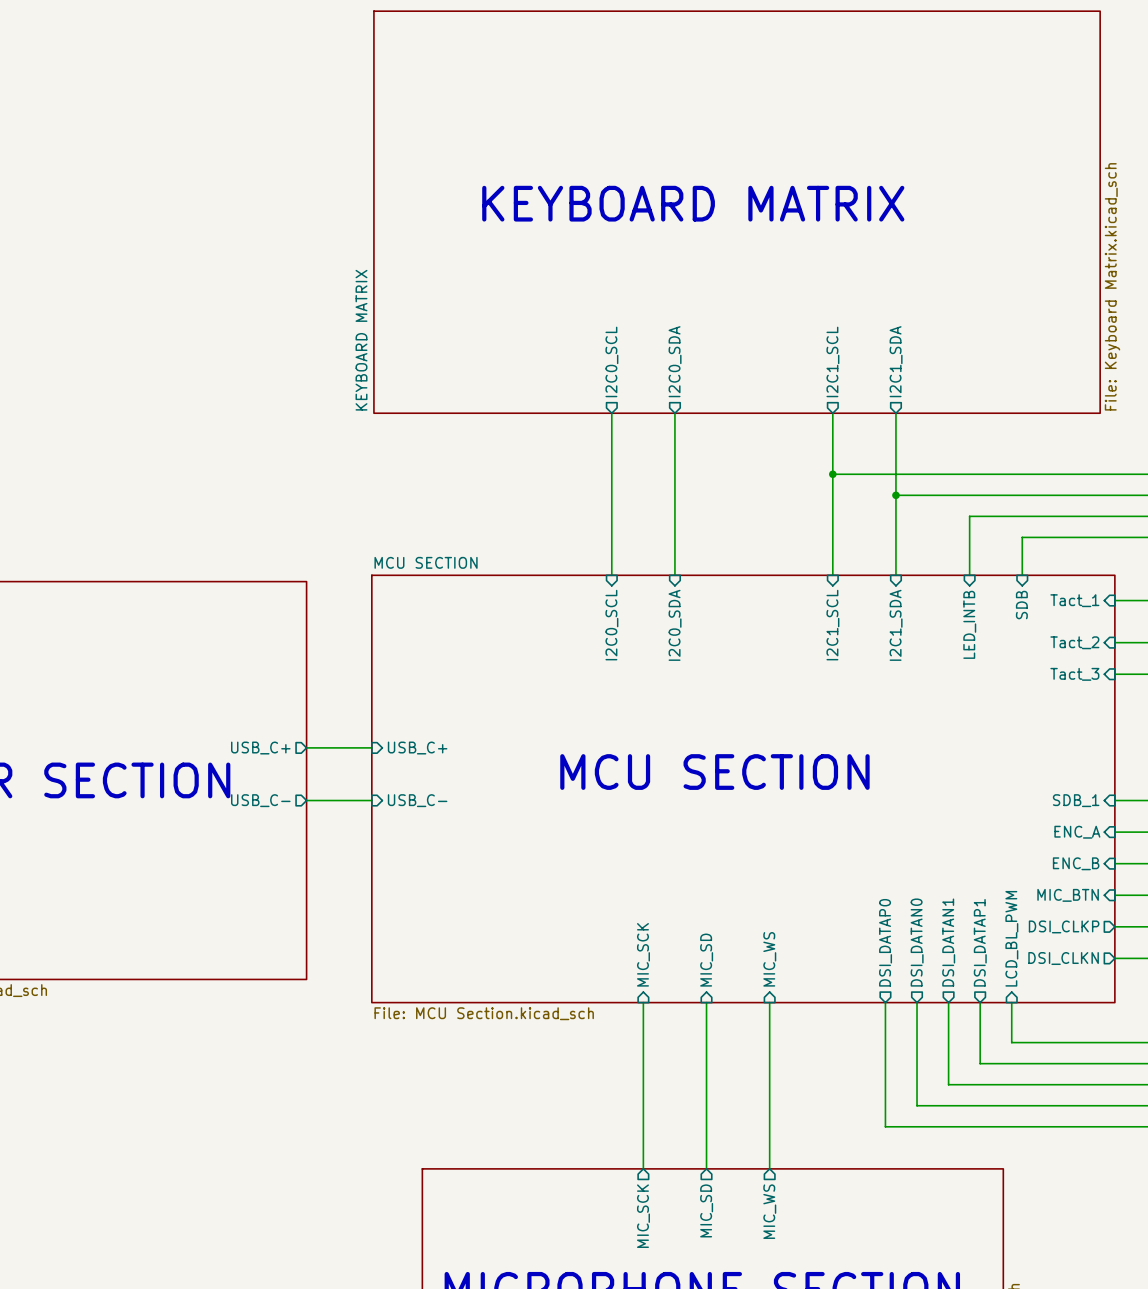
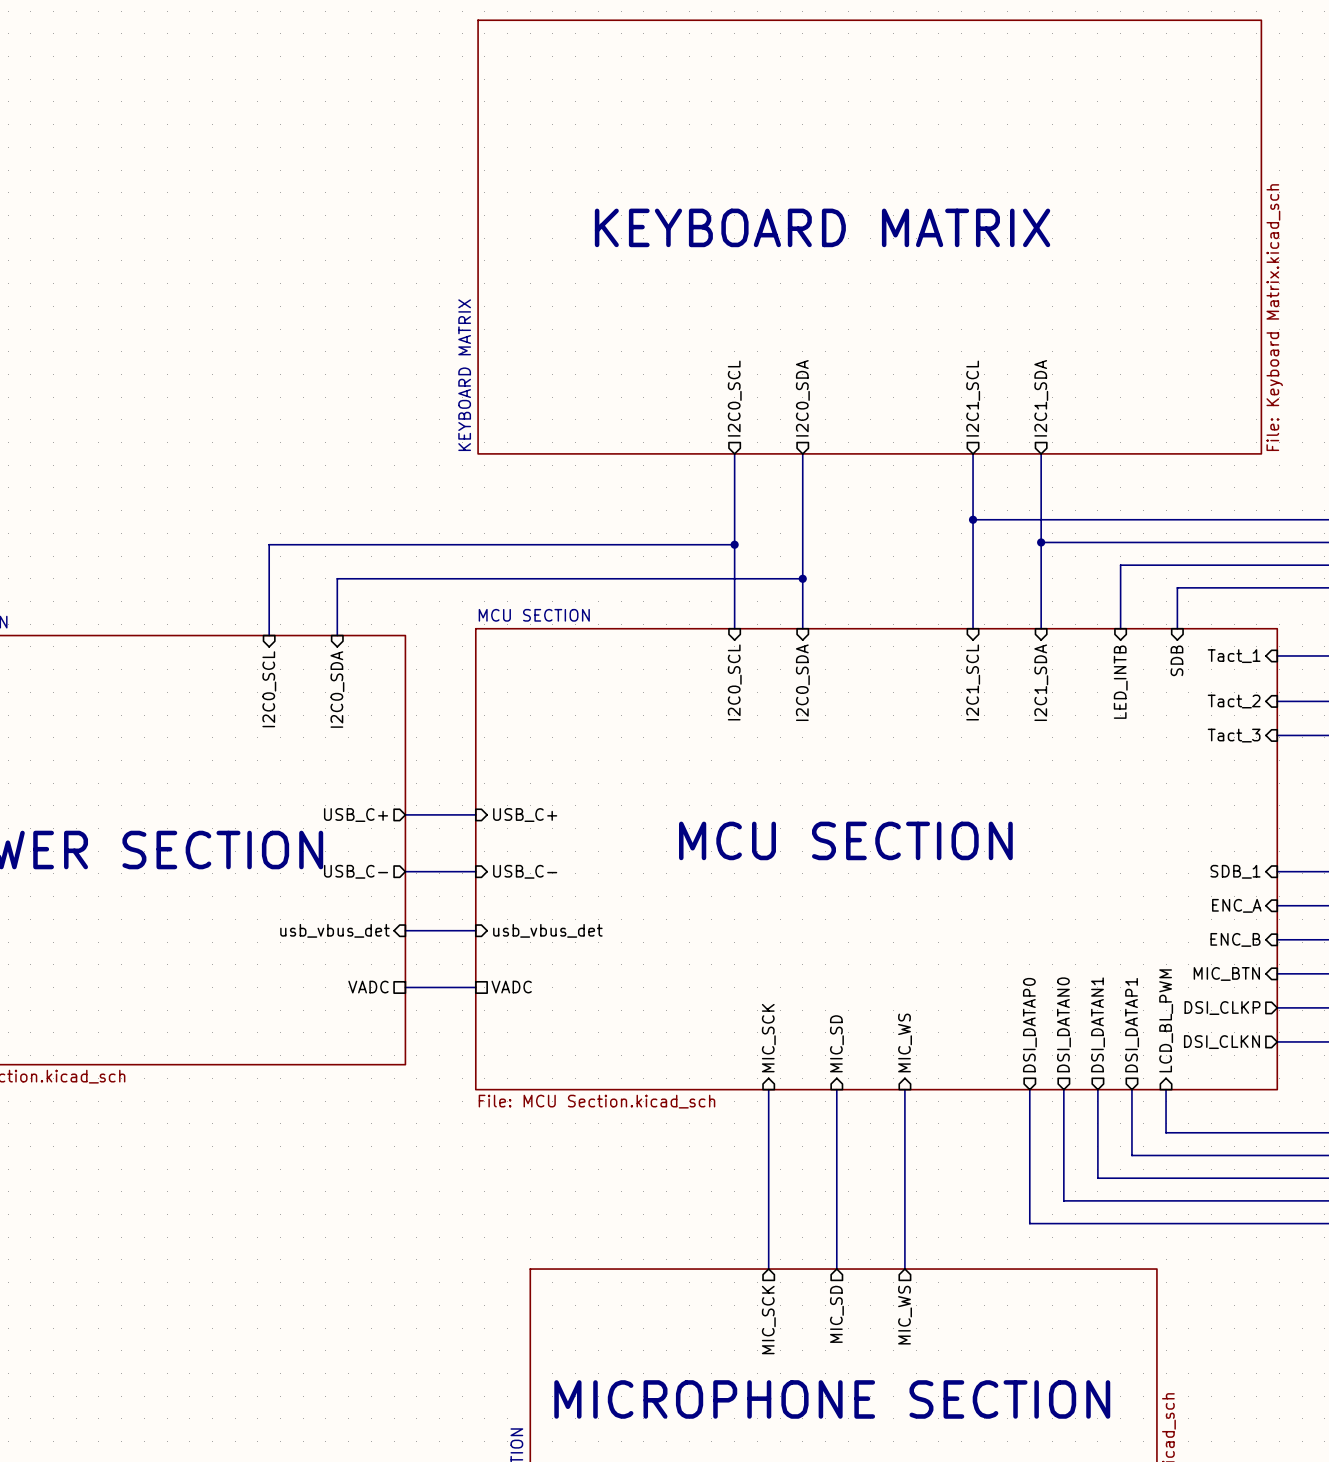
wire: none -> (734, 544) (269, 544) (269, 635)
junction: none -> (734, 544)
wire: none -> (802, 578) (337, 578) (337, 635)
junction: none -> (802, 578)
sheet pin: none -> I2C0_SCL (269, 689)
sheet pin: none -> I2C0_SDA (337, 689)
sheet pin: none -> usb_vbus_det (334, 930)
wire: none -> (405, 930) (475, 930)
sheet pin: none -> usb_vbus_det (547, 930)
sheet pin: none -> VADC (368, 987)
wire: none -> (405, 987) (475, 987)
sheet pin: none -> VADC (511, 987)

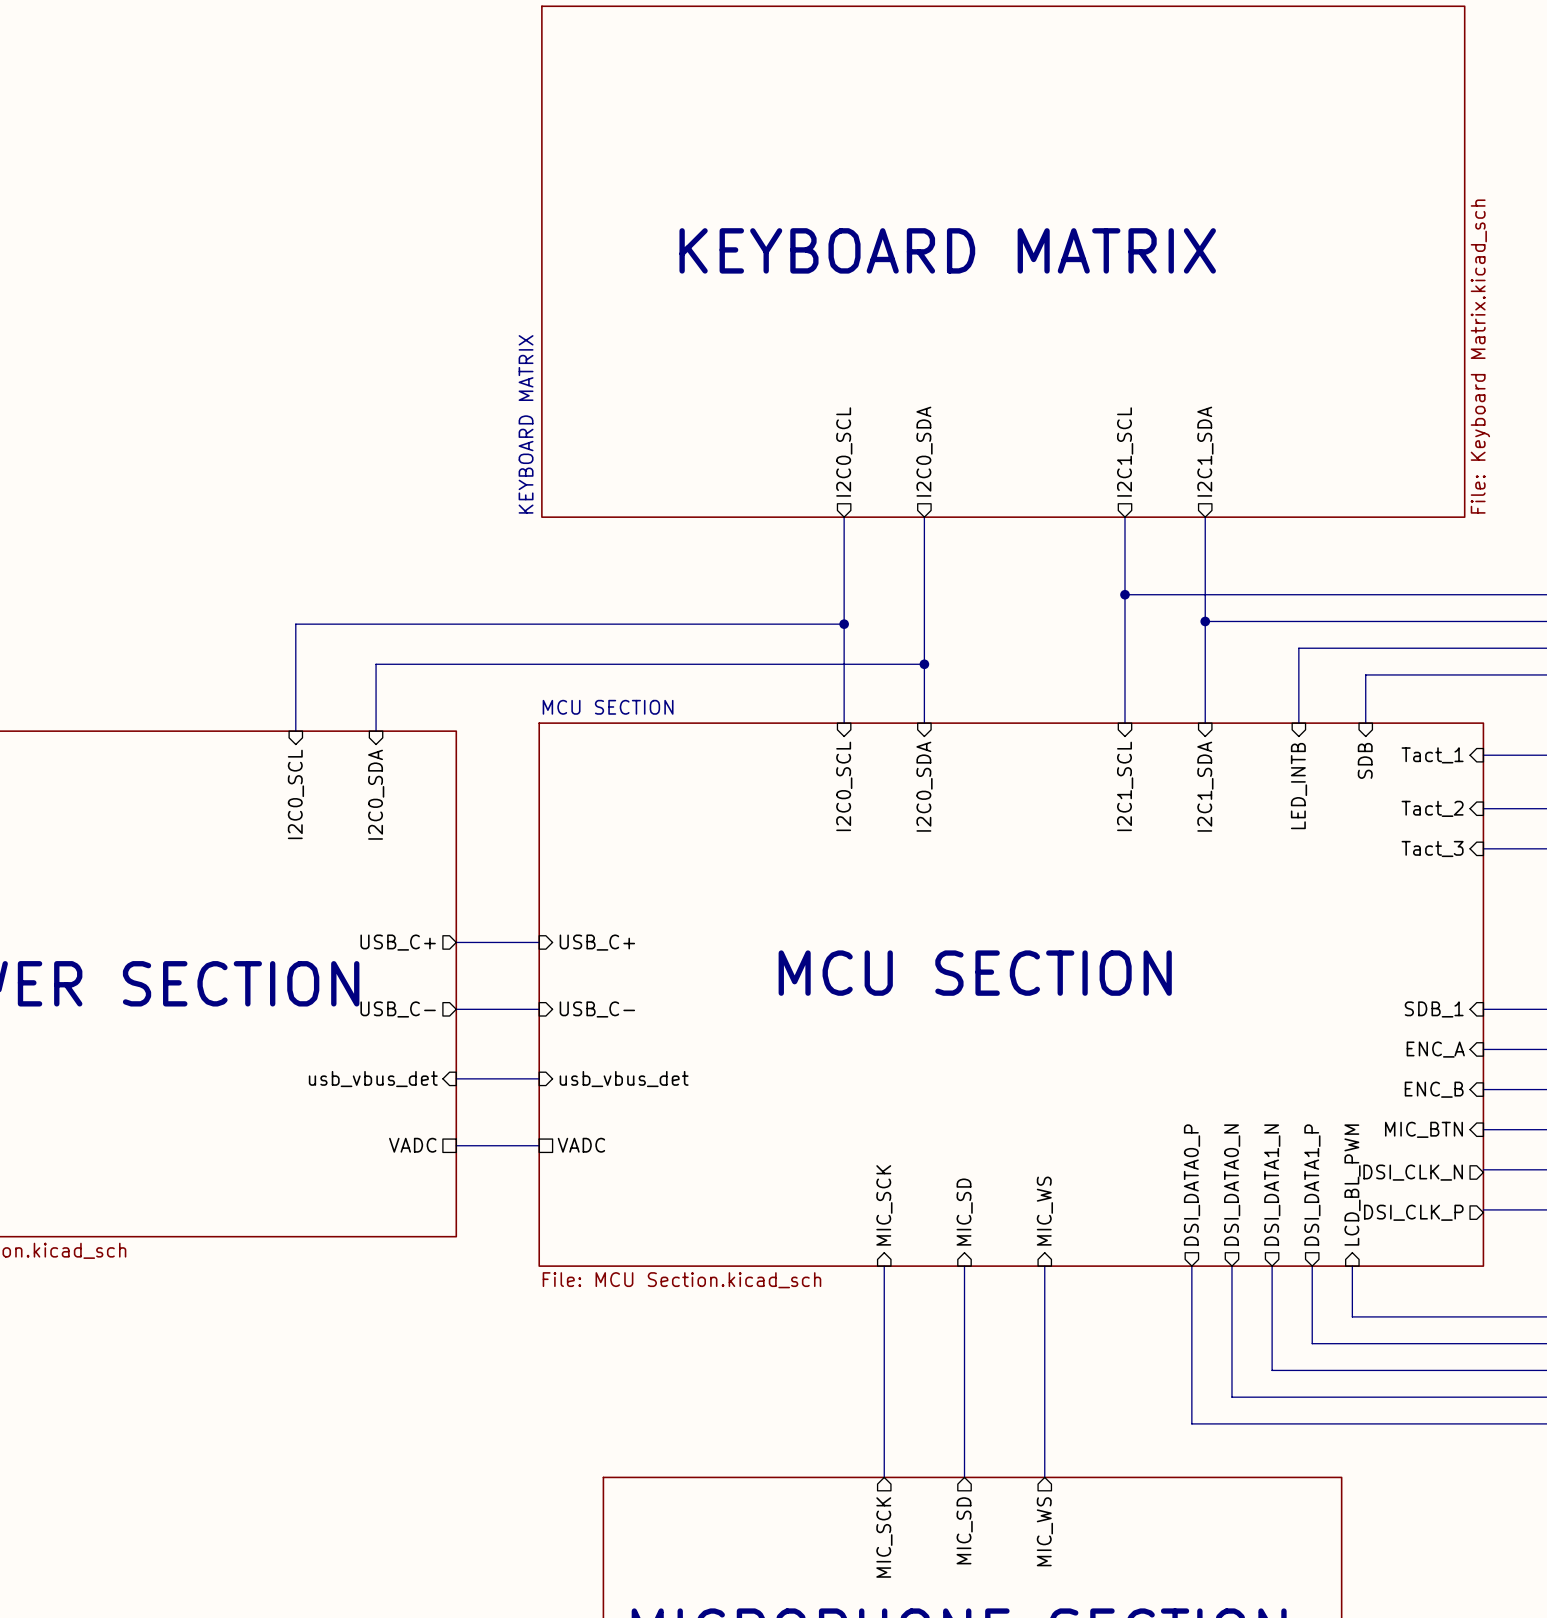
sheet pin: DSI_CLKP (1222, 1008) -> DSI_CLK_N (1413, 1172)
sheet pin: DSI_DATAN0 (1063, 1024) -> DSI_DATA0_N (1232, 1185)
sheet pin: DSI_DATAN1 (1098, 1024) -> DSI_DATA1_N (1272, 1185)
sheet pin: DSI_DATAP0 (1029, 1025) -> DSI_DATA0_P (1192, 1185)
sheet pin: DSI_DATAP1 (1132, 1025) -> DSI_DATA1_P (1312, 1185)
sheet pin: DSI_CLKN (1221, 1042) -> DSI_CLK_P (1413, 1212)

